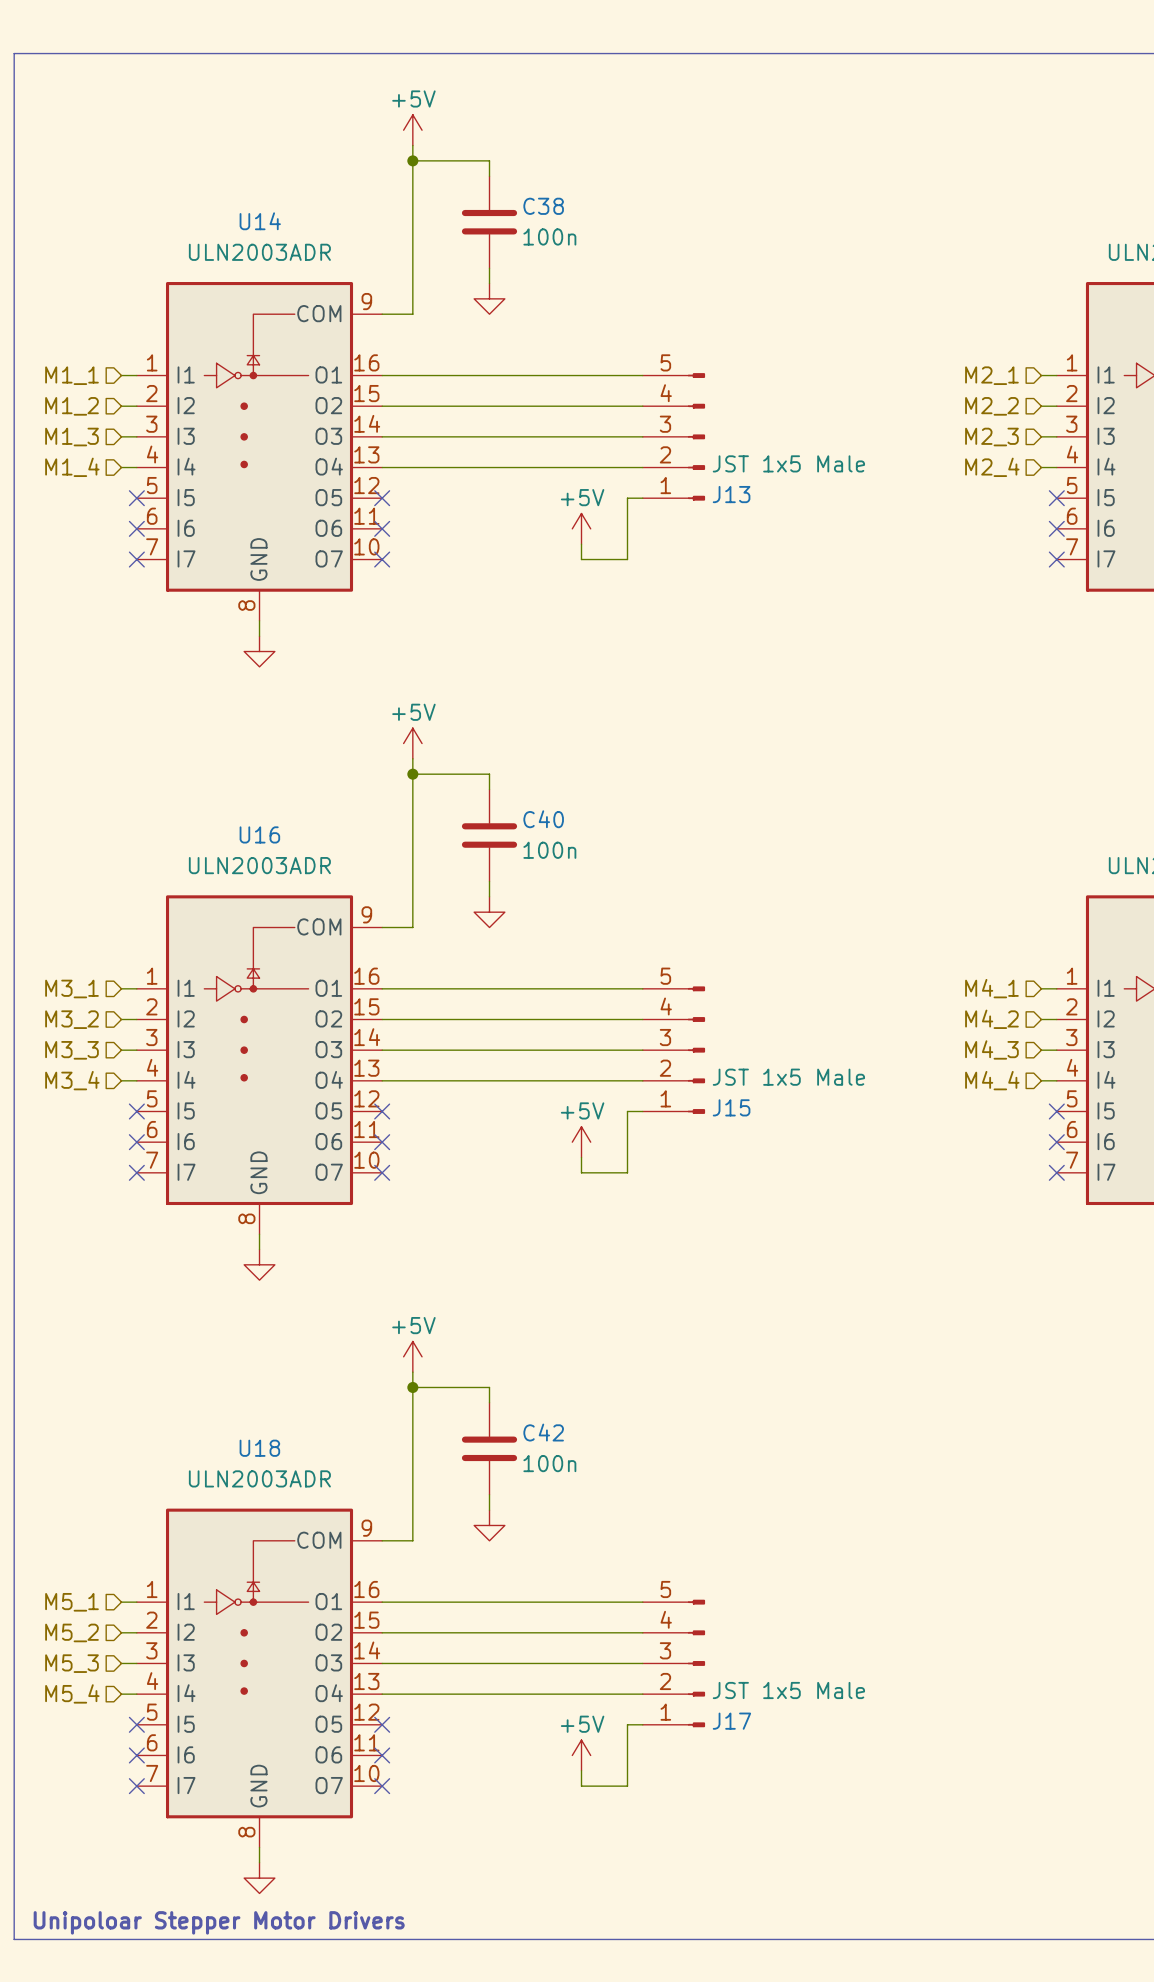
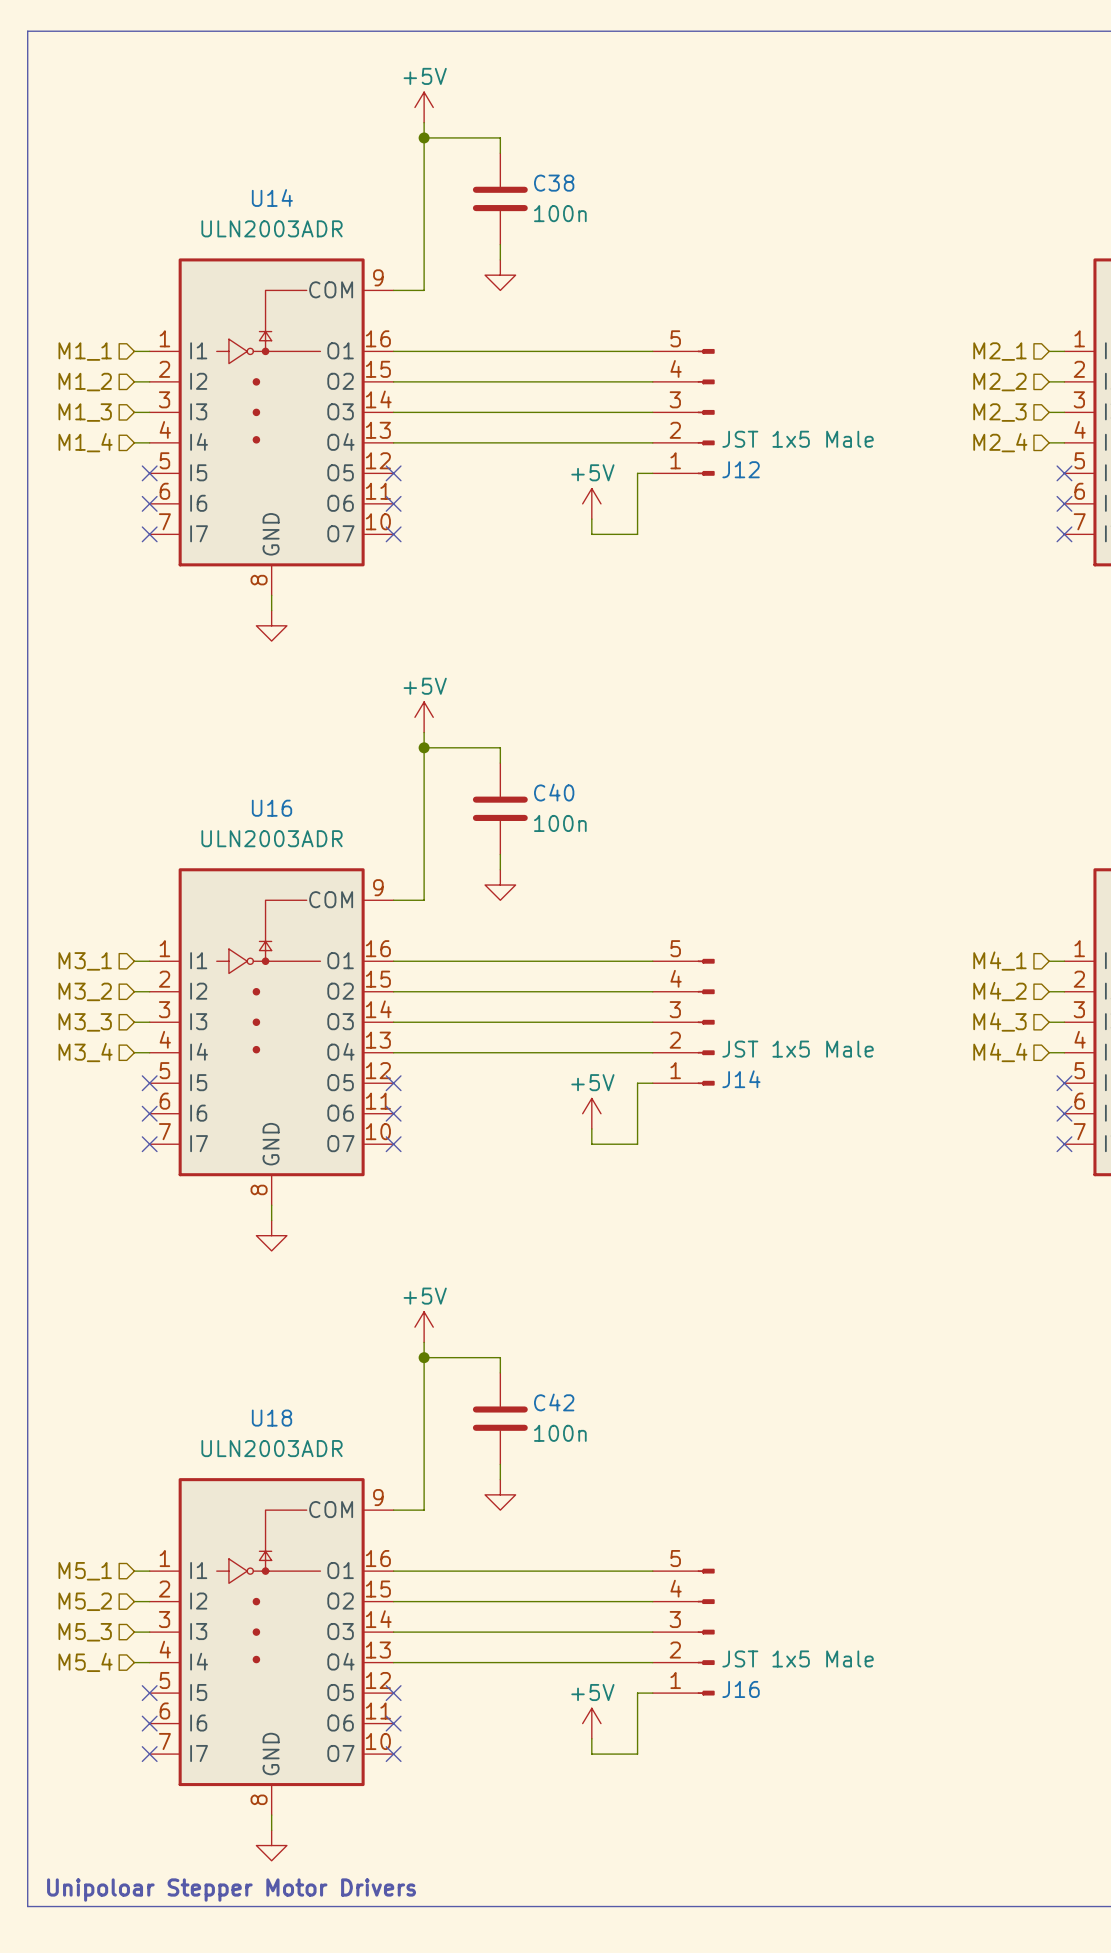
J13 name: J13 (731, 494) -> J12 (741, 469)
J15 name: J15 (731, 1107) -> J14 (741, 1079)
J17 name: J17 (731, 1721) -> J16 (741, 1689)

